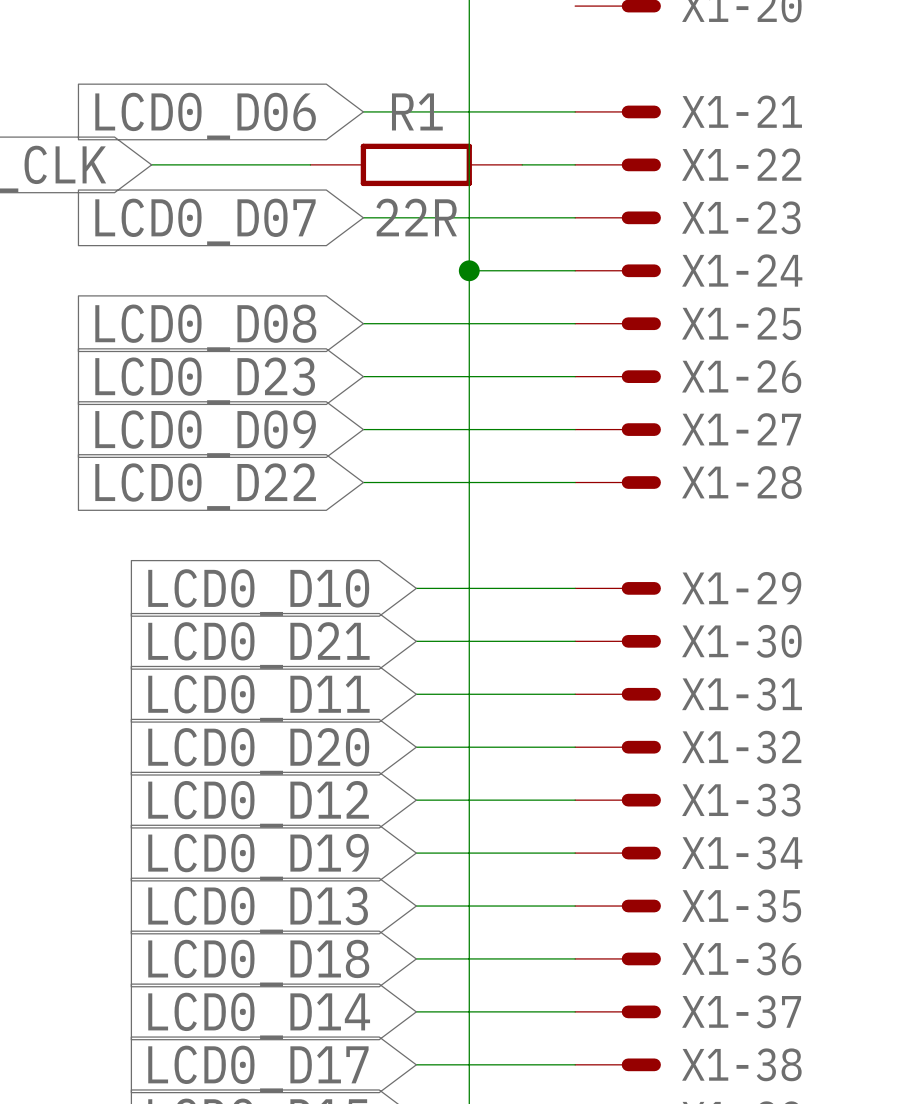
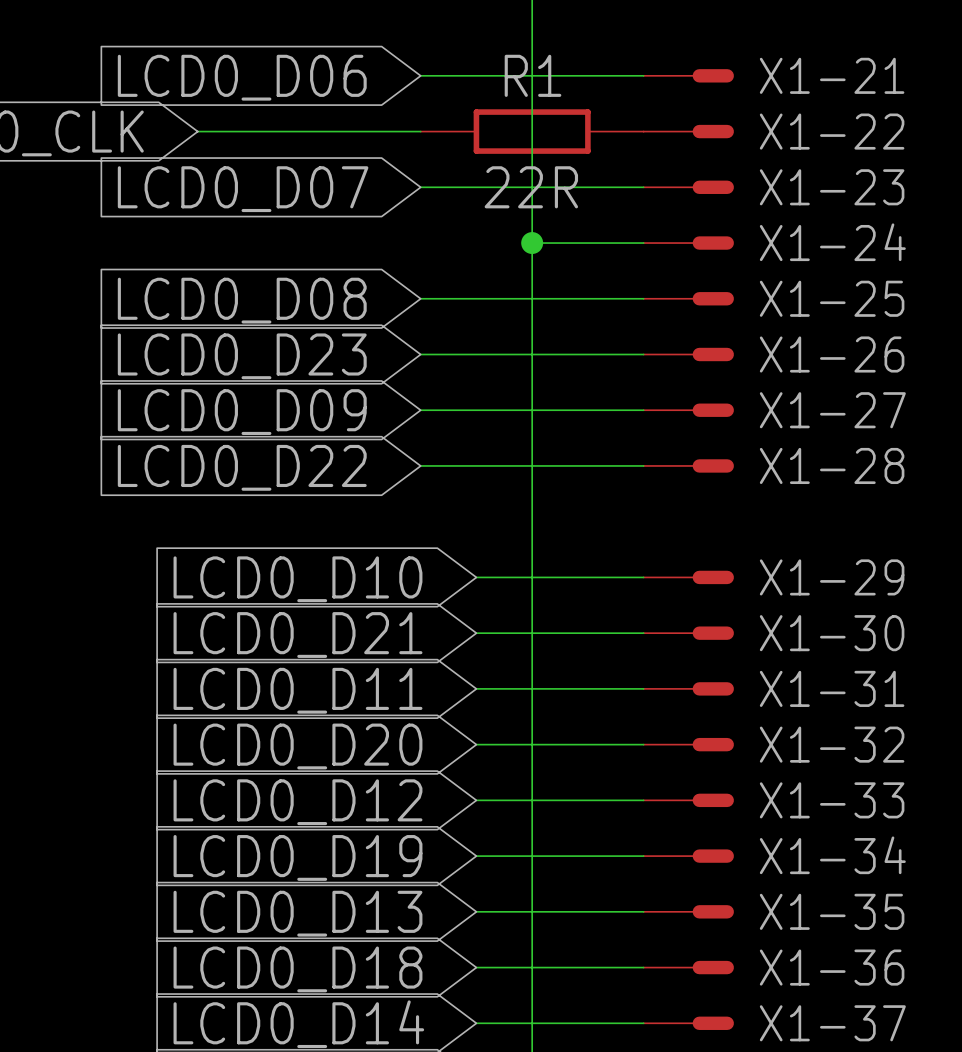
R1 position: (416, 164) -> (532, 131)

